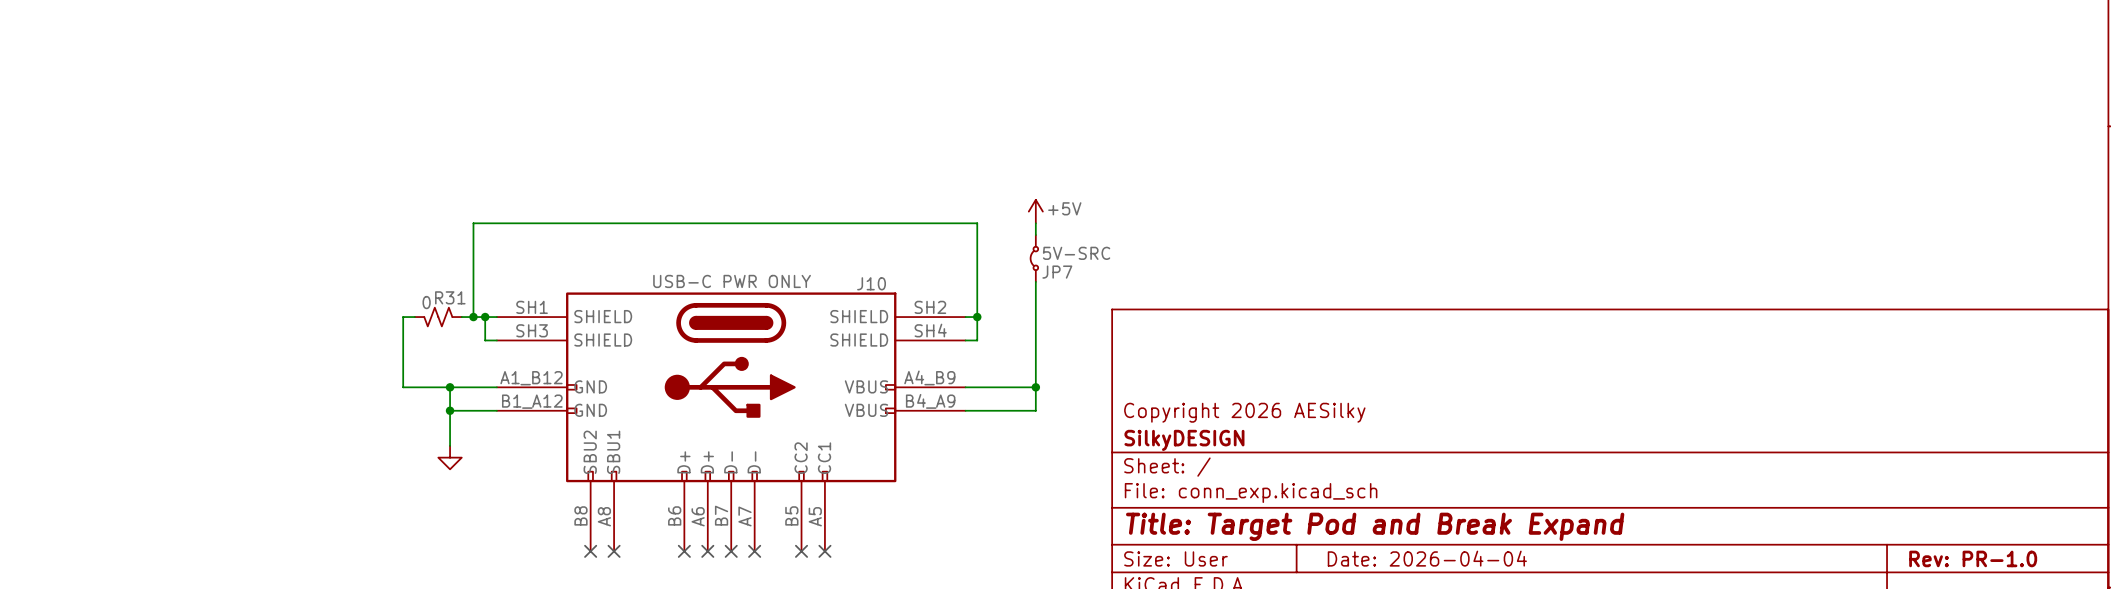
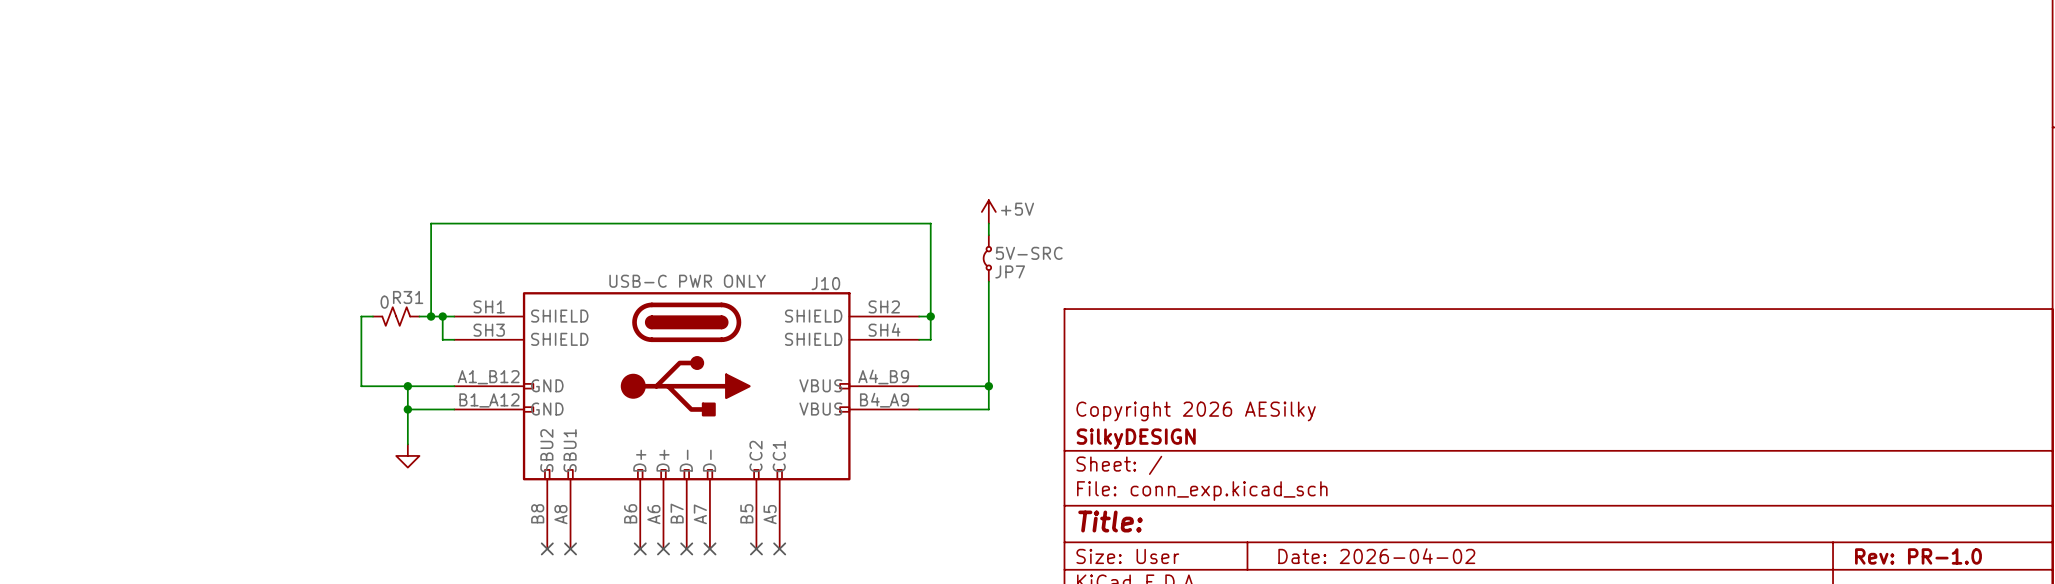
title block: Title: Target Pod and Break Expand (1375, 526) -> Title: (1110, 521)
title block: Date: 2026-04-04 (1427, 558) -> Date: 2026-04-02 (1376, 556)

